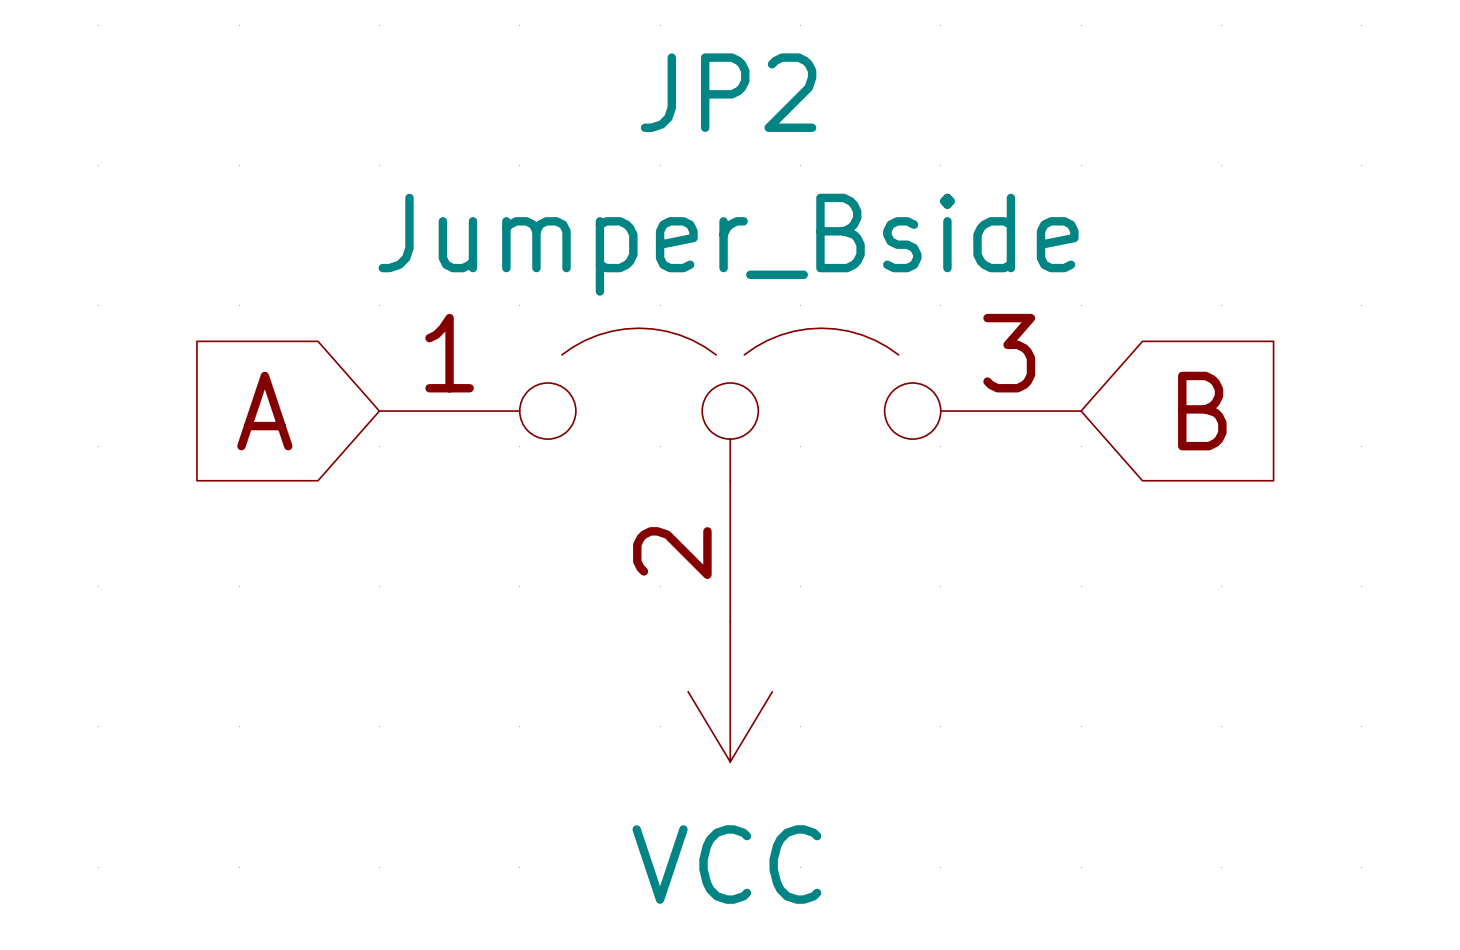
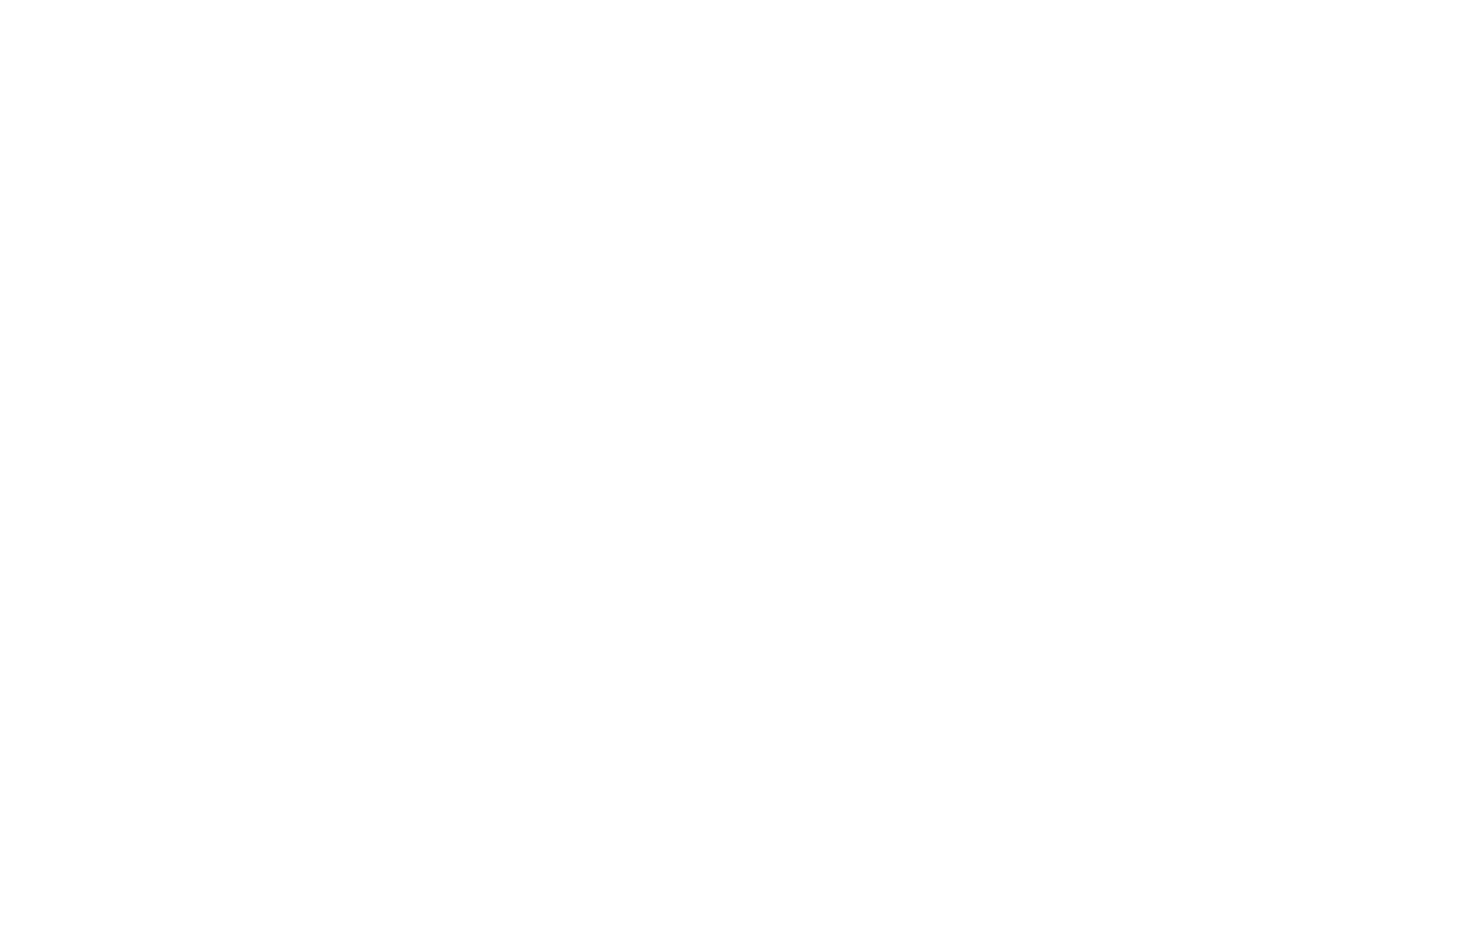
global label: A (264, 411) -> none
global label: B (1202, 411) -> none
JP2: Jumper_Bside (730, 474) -> none
power symbol: VCC (730, 691) -> none

